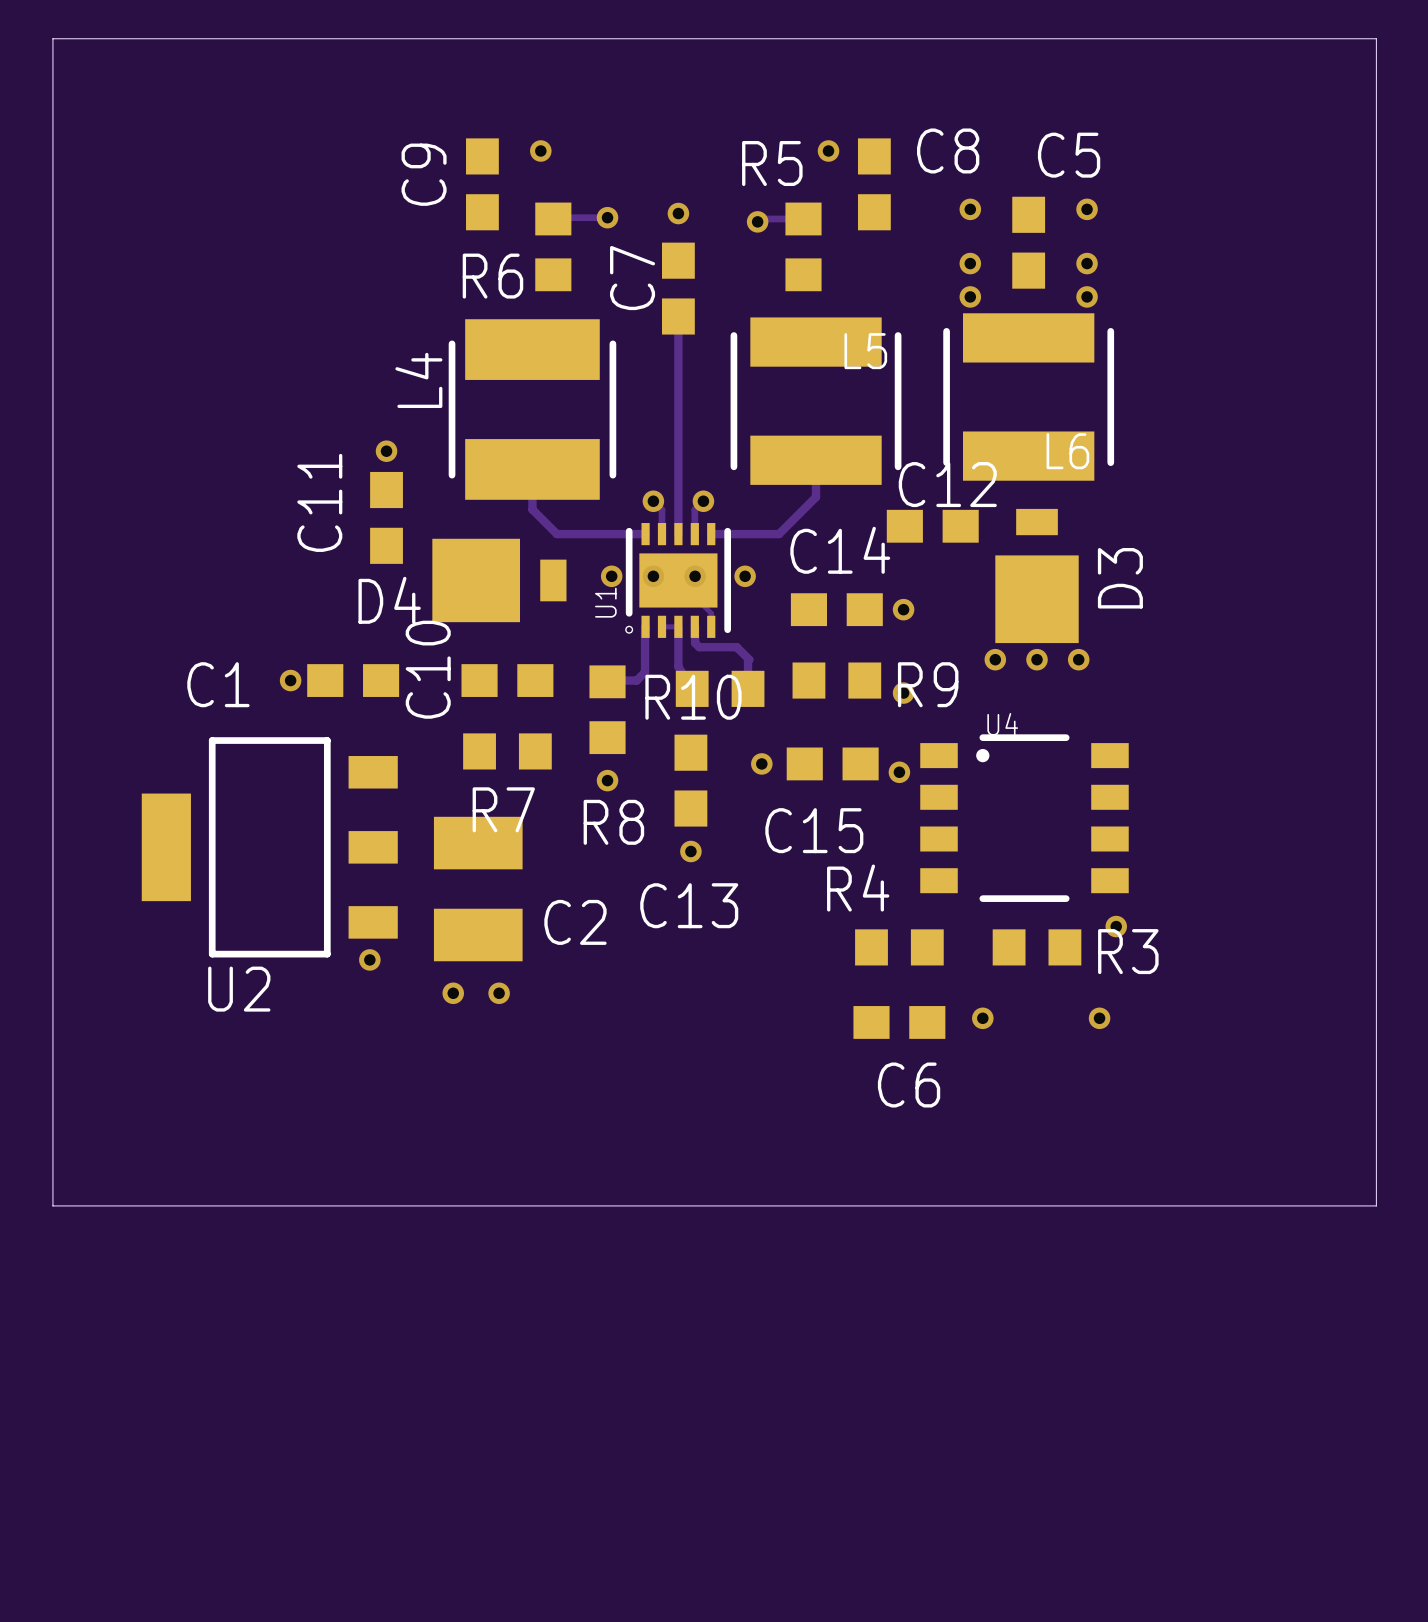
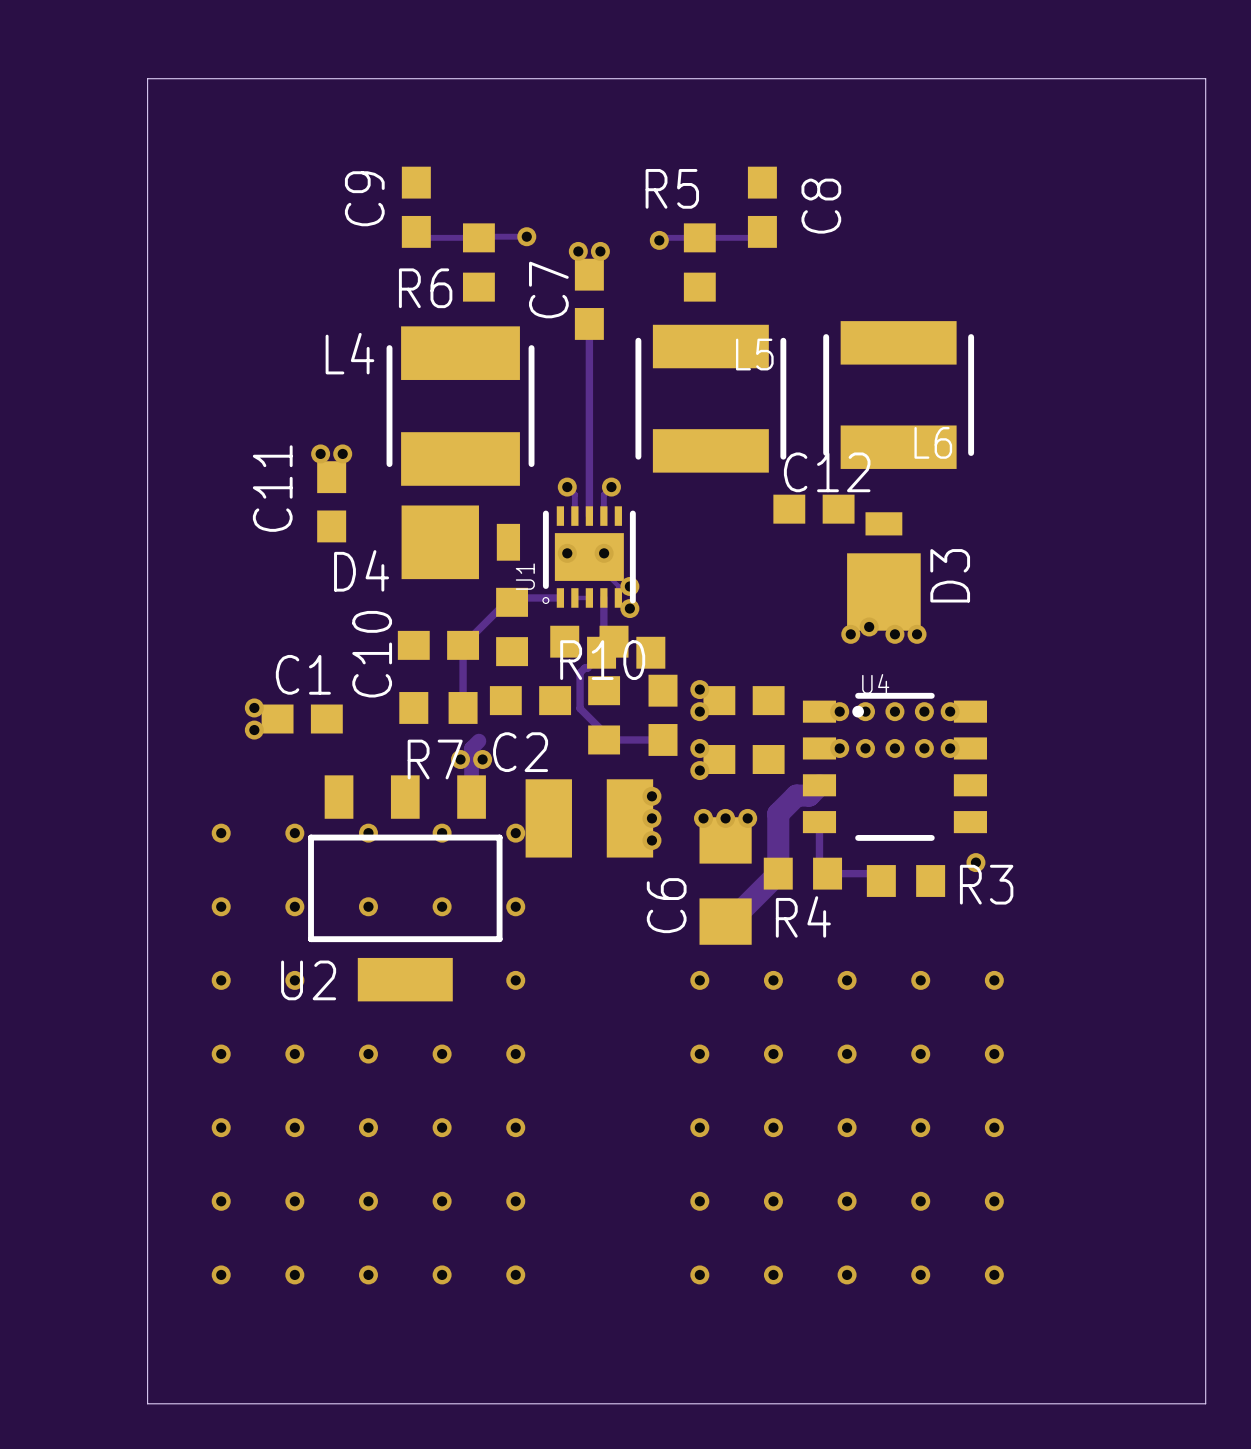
board edge: (178, 38) (52, 38) (52, 1205) (1376, 1205) -> (147, 78) (147, 1403) (1205, 1403) (1205, 1109)
via: (540, 150) -> none
via: (828, 150) -> none
C8 name rotation: 0° (948, 150) -> 90° counterclockwise (821, 206)
via: (970, 209) -> none
via: (1087, 209) -> none
track: none -> (416, 231) (422, 237) (478, 237)
track: none -> (762, 231) (756, 237) (699, 237)
via: (678, 213) -> none
via: none -> (578, 251)
via: none -> (600, 251)
C5: (1028, 242) -> none
via: (970, 263) -> none
via: (1087, 263) -> none
via: (970, 296) -> none
via: (1087, 296) -> none
L4 name rotation: 0° (418, 380) -> 90° clockwise (349, 353)
via: (386, 451) -> none
track: (816, 460) (816, 497) (778, 534) (711, 534) -> none
via: none -> (320, 453)
via: none -> (342, 453)
track: (532, 469) (532, 509) (556, 534) (645, 534) -> none
D3 position: (1037, 575) -> (883, 571)
via: (611, 576) -> none
via: (745, 576) -> none
D3 name position: D3 (1120, 578) -> D3 (950, 575)
D4 position: (499, 580) -> (460, 542)
D4 name position: D4 (389, 600) -> D4 (361, 570)
C14: (836, 609) -> none
via: (903, 609) -> none
via: none -> (629, 586)
track: (645, 626) (645, 672) (636, 680) (607, 681) -> (560, 597) (516, 597) (512, 602) (506, 602) (463, 645) (463, 707)
track: (678, 626) (678, 666) (692, 688) -> none
track: (695, 627) (695, 643) (699, 647) (736, 647) (749, 659) (748, 688) -> (603, 597) (603, 631) (614, 641) (587, 668) (580, 672) (580, 708) (604, 732) (604, 739) (663, 739)
via: none -> (629, 608)
part: none -> (512, 626)
via: (1037, 659) -> none
via: (1078, 659) -> none
via: none -> (850, 634)
via: none -> (894, 634)
via: none -> (917, 634)
C10 name position: C10 (428, 669) -> C10 (372, 654)
part: none -> (589, 641)
via: (290, 680) -> none
C1 position: (353, 680) -> (302, 719)
R9: (836, 680) -> none
C1 name position: C1 (218, 684) -> C1 (303, 674)
via: (903, 693) -> none
R8: (607, 709) -> none
via: none -> (699, 689)
part: none -> (530, 700)
part: none -> (744, 700)
via: none -> (254, 707)
via: none -> (699, 711)
via: none -> (839, 711)
via: none -> (865, 711)
via: none -> (894, 711)
via: none -> (924, 711)
via: none -> (950, 711)
part: none -> (604, 715)
part: none -> (663, 715)
via: (761, 763) -> none
C15: (832, 763) -> none
via: (899, 772) -> none
via: none -> (254, 730)
via: (607, 780) -> none
C13: (690, 780) -> none
track: none -> (478, 741) (471, 748) (471, 797)
via: none -> (699, 748)
via: none -> (839, 748)
via: none -> (865, 748)
via: none -> (894, 748)
via: none -> (924, 748)
via: none -> (950, 748)
via: none -> (460, 759)
via: none -> (482, 759)
part: none -> (744, 759)
via: none -> (699, 770)
track: none -> (819, 785) (809, 795) (796, 795) (778, 813) (778, 873) (730, 921) (725, 921)
U2 rotation: 0° (269, 847) -> 90° counterclockwise (405, 888)
U2 position: (269, 847) -> (405, 888)
via: (690, 851) -> none
via: none -> (651, 796)
via: none -> (651, 818)
via: none -> (703, 818)
via: none -> (725, 818)
via: none -> (747, 818)
track: none -> (819, 822) (819, 865) (827, 873) (870, 873)
R4 name position: R4 (858, 888) -> R4 (803, 916)
C2 rotation: 0° (478, 889) -> 90° clockwise (589, 818)
C2 position: (478, 889) -> (589, 818)
via: none -> (221, 833)
via: none -> (294, 833)
via: none -> (368, 833)
via: none -> (442, 833)
via: none -> (515, 833)
via: none -> (651, 840)
C2 name position: C2 (575, 922) -> C2 (520, 752)
R4 position: (899, 947) -> (802, 873)
via: (369, 959) -> none
via: none -> (221, 906)
via: none -> (294, 906)
via: none -> (368, 906)
via: none -> (515, 906)
U2 name position: U2 (239, 989) -> U2 (308, 980)
via: (453, 993) -> none
via position: (499, 993) -> (442, 906)
C6 footprint: [853, 1006, 946, 1039] -> [699, 817, 752, 945]
via: (982, 1018) -> none
via: (1099, 1018) -> none
via: none -> (221, 980)
via: none -> (294, 980)
via: none -> (515, 980)
via: none -> (699, 980)
via: none -> (773, 980)
via: none -> (847, 980)
via: none -> (920, 980)
via: none -> (994, 980)
C6 name position: C6 (909, 1085) -> C6 (666, 905)
via: none -> (221, 1054)
via: none -> (294, 1054)
via: none -> (368, 1054)
via: none -> (442, 1054)
via: none -> (515, 1054)
via: none -> (699, 1054)
via: none -> (773, 1054)
via: none -> (847, 1054)
via: none -> (920, 1054)
via: none -> (994, 1054)
via: none -> (221, 1127)
via: none -> (294, 1127)
via: none -> (368, 1127)
via: none -> (442, 1127)
via: none -> (515, 1127)
via: none -> (699, 1127)
via: none -> (773, 1127)
via: none -> (847, 1127)
via: none -> (920, 1127)
via: none -> (994, 1127)
via: none -> (221, 1201)
via: none -> (294, 1201)
via: none -> (368, 1201)
via: none -> (442, 1201)
via: none -> (515, 1201)
via: none -> (699, 1201)
via: none -> (773, 1201)
via: none -> (847, 1201)
via: none -> (920, 1201)
via: none -> (994, 1201)
via: none -> (221, 1274)
via: none -> (294, 1274)
via: none -> (368, 1274)
via: none -> (442, 1274)
via: none -> (515, 1274)
via: none -> (699, 1274)
via: none -> (773, 1274)
via: none -> (847, 1274)
via: none -> (920, 1274)
via: none -> (994, 1274)

